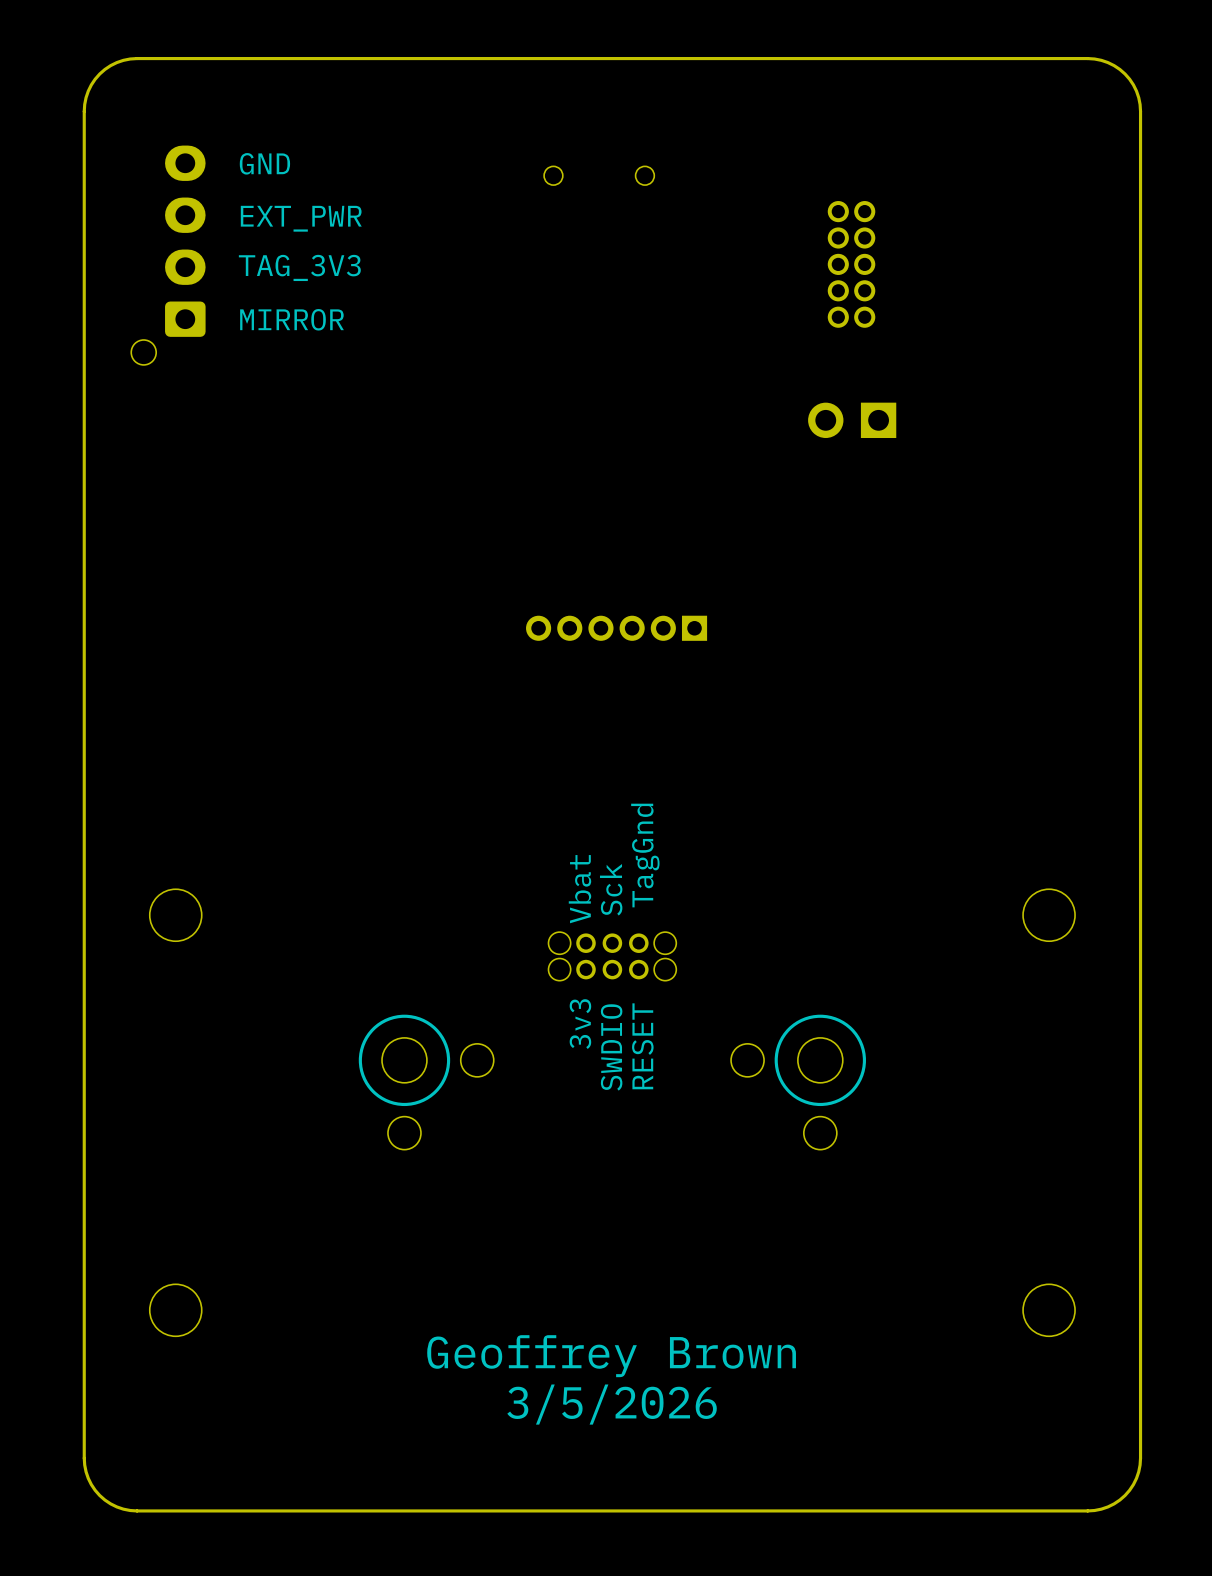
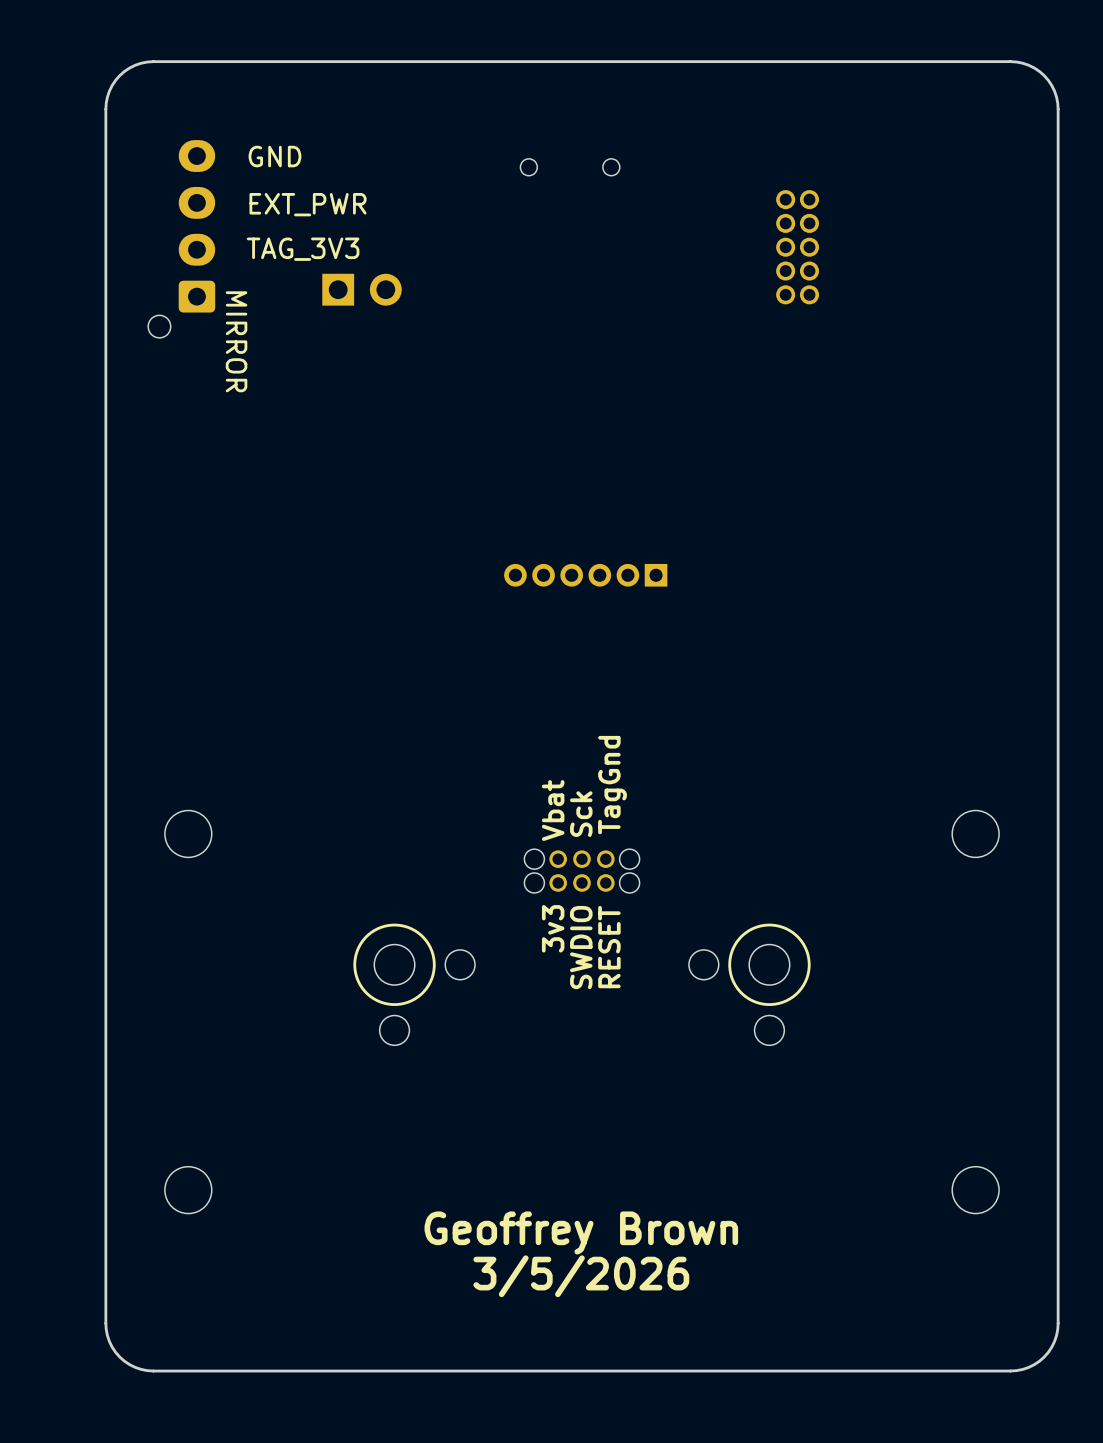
text rotation: 0° (292, 319) -> 90° clockwise (236, 341)
part rotation: 0° (852, 420) -> 180° (362, 289)
part position: (852, 420) -> (362, 289)

